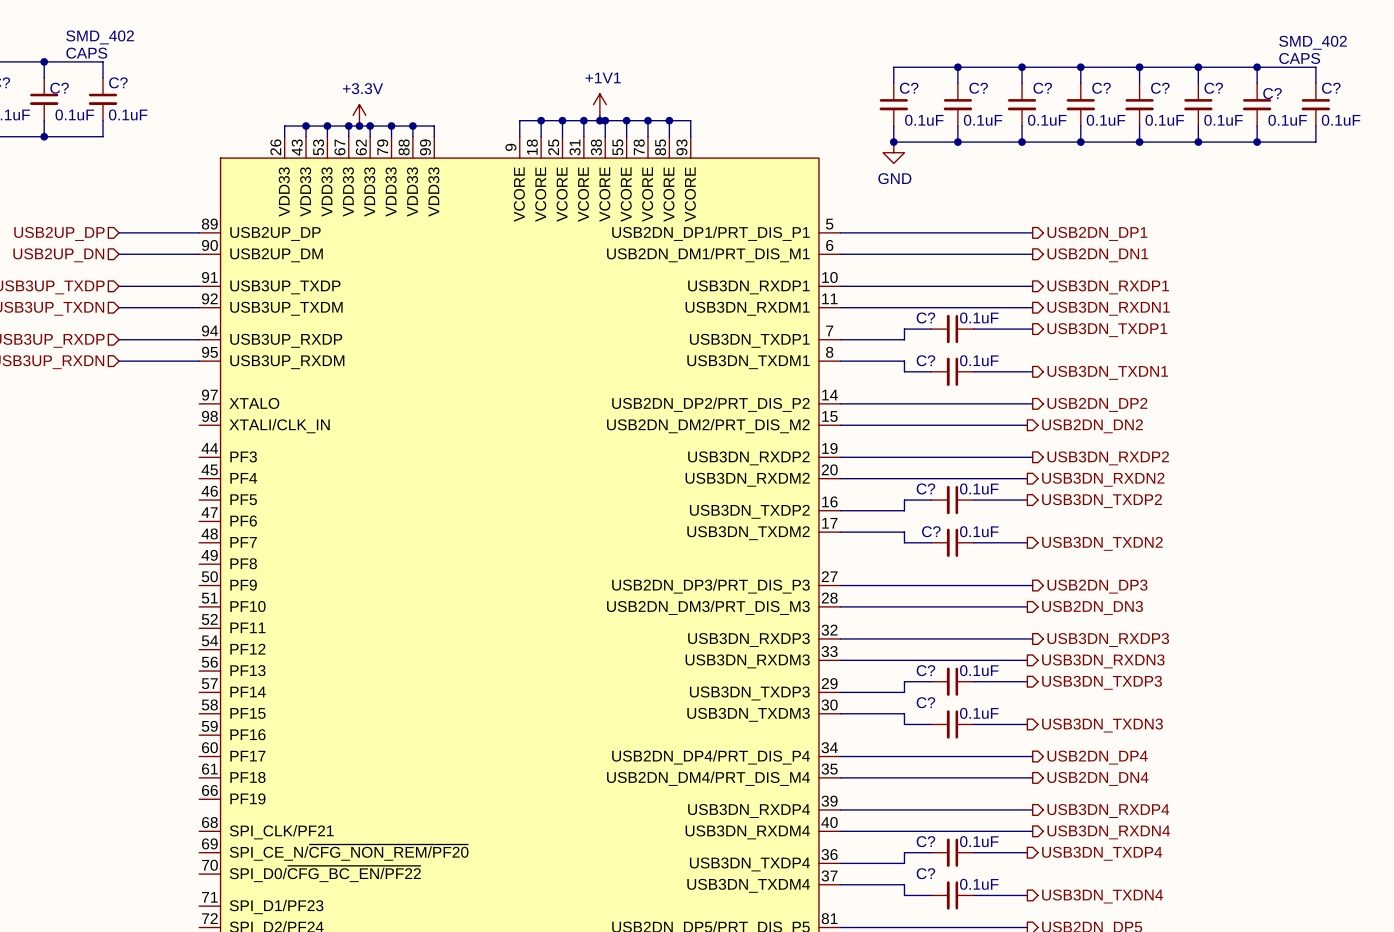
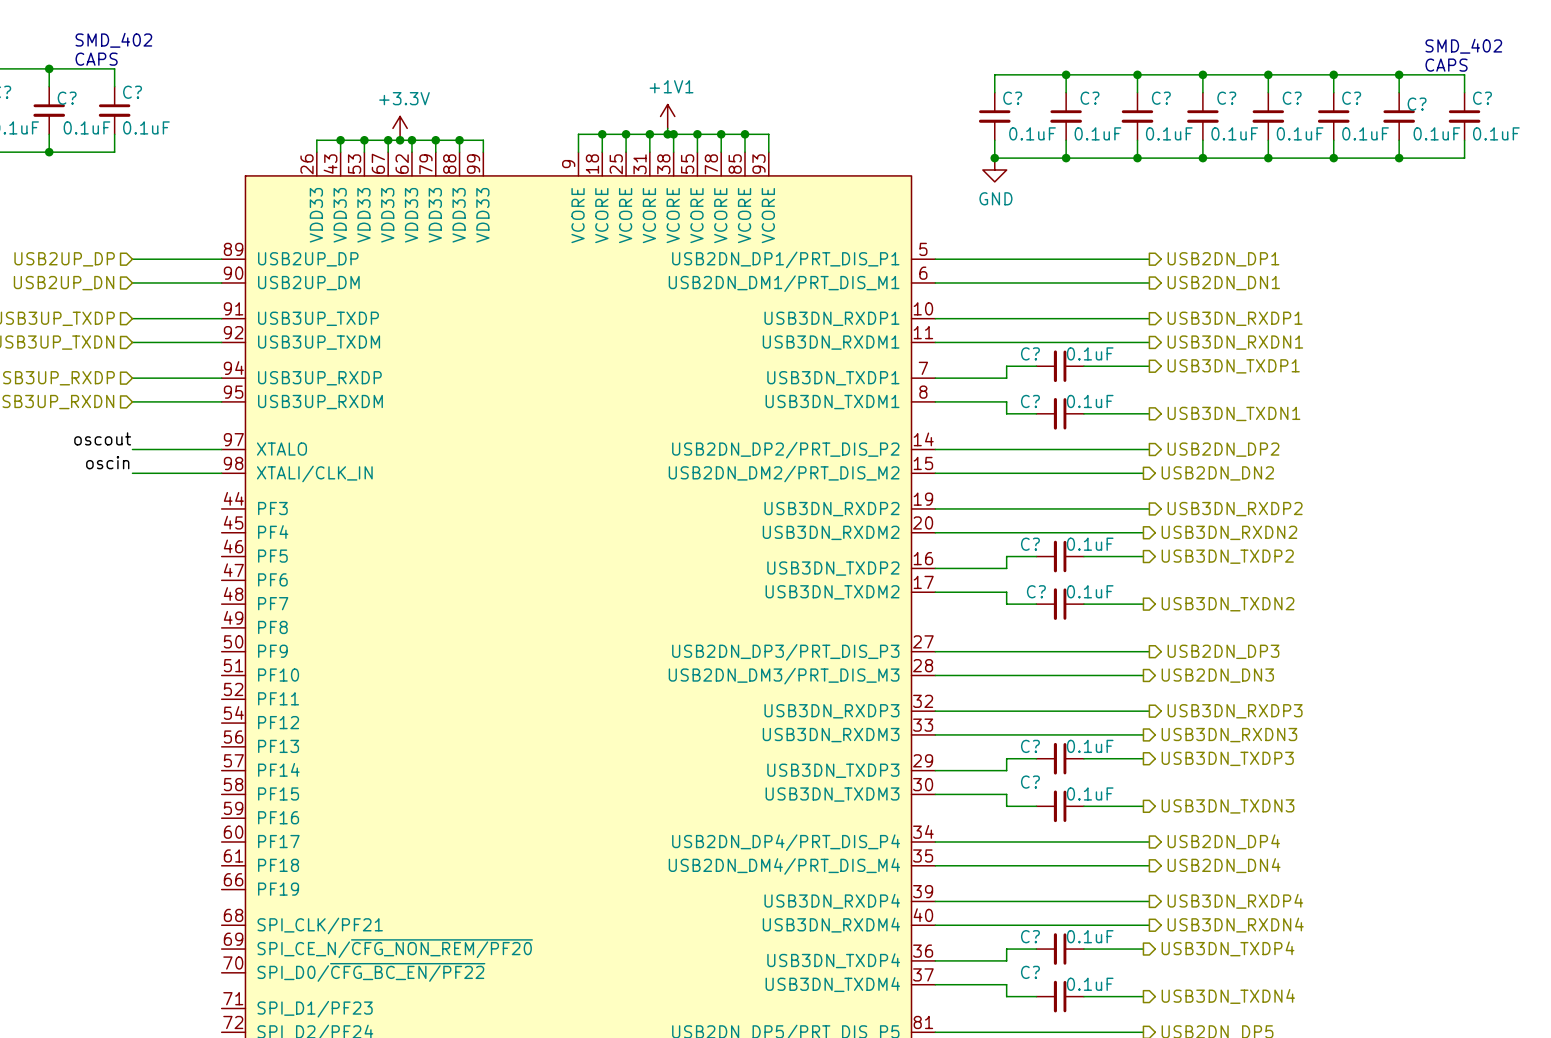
label: none -> oscout (102, 438)
wire: none -> (132, 449) (221, 449)
label: none -> oscin (107, 462)
wire: none -> (132, 473) (221, 473)

